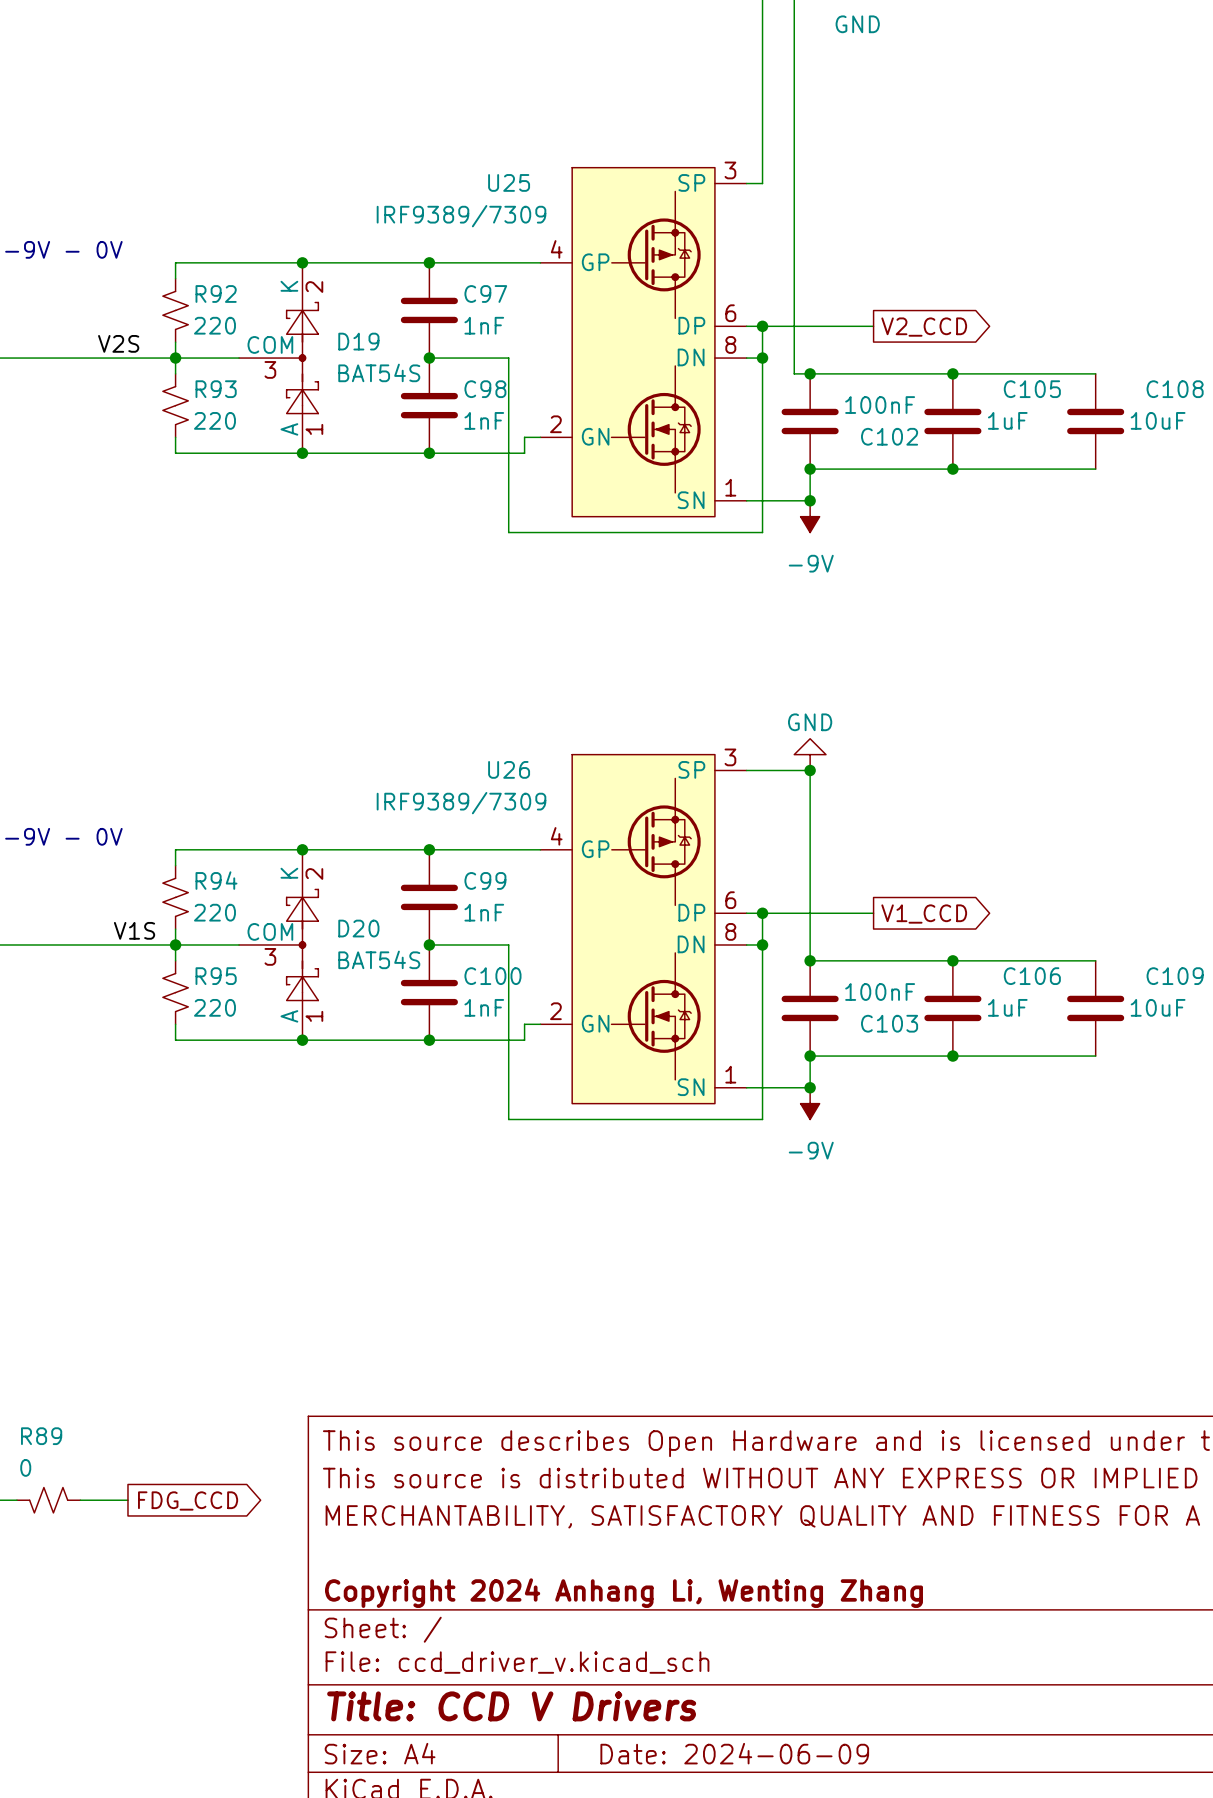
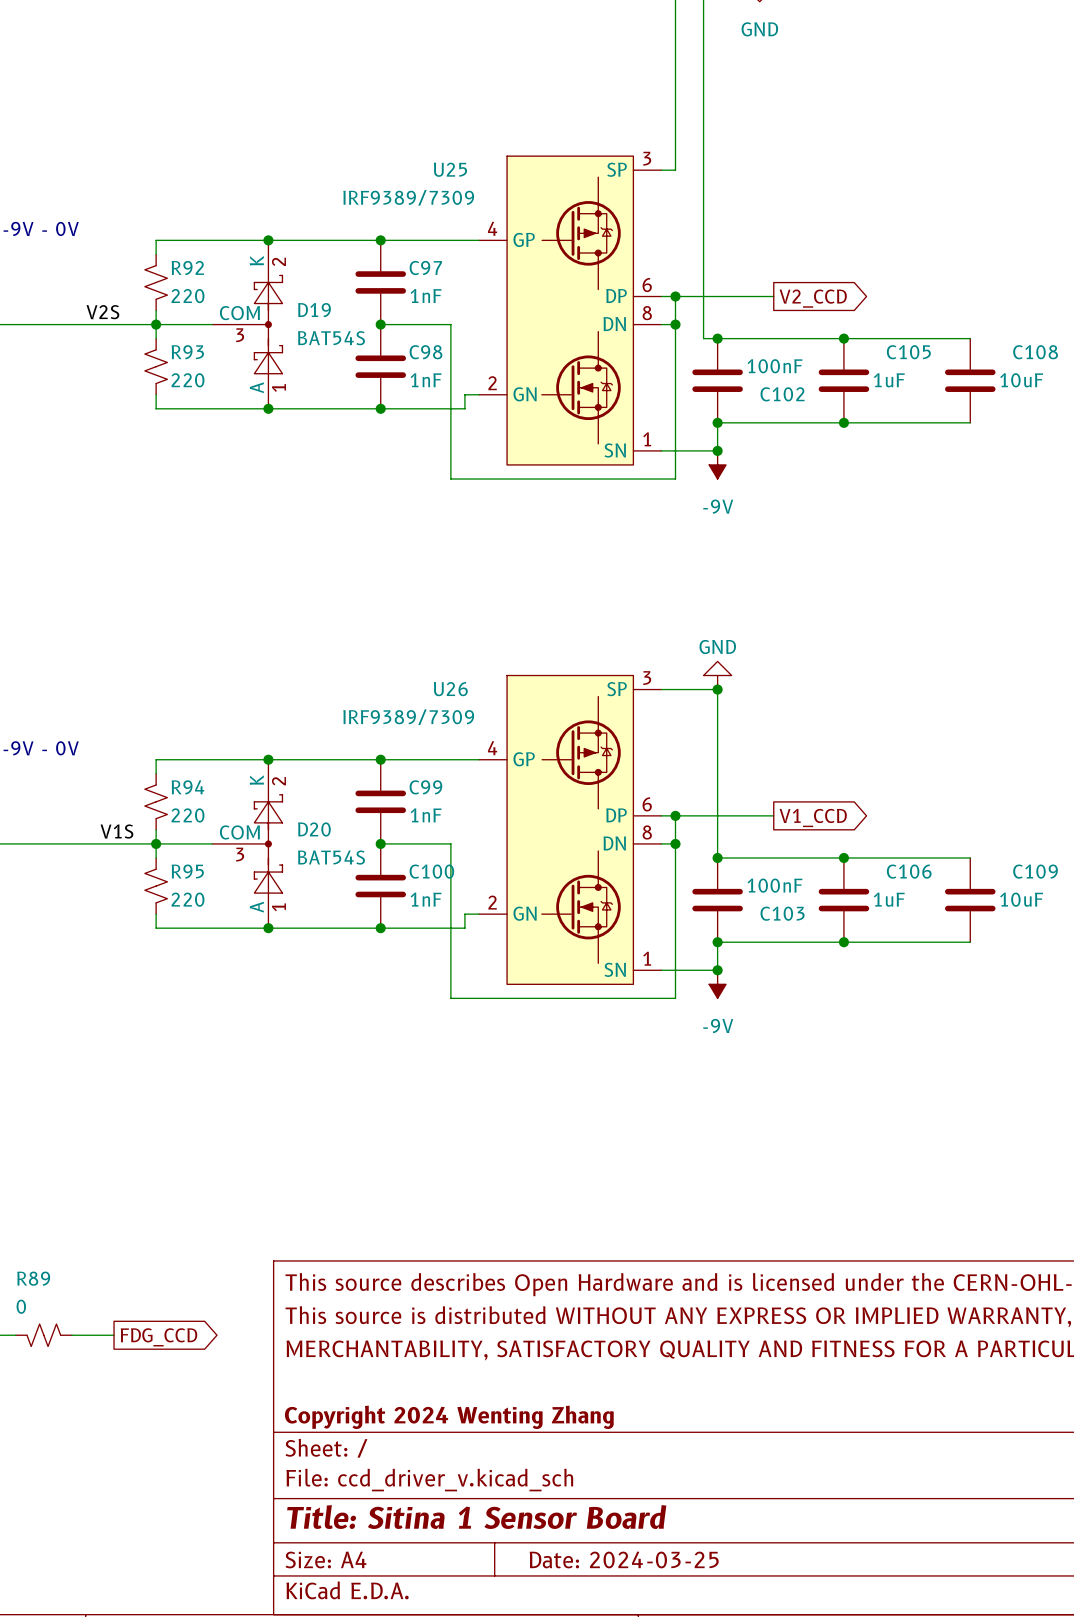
title block: Copyright 2024 Anhang Li, Wenting Zhang (623, 1593) -> Copyright 2024 Wenting Zhang (449, 1417)
title block: Title: CCD V Drivers (511, 1706) -> Title: Sitina 1 Sensor Board (476, 1517)
title block: Date: 2024-06-09 (734, 1753) -> Date: 2024-03-25 (624, 1559)

